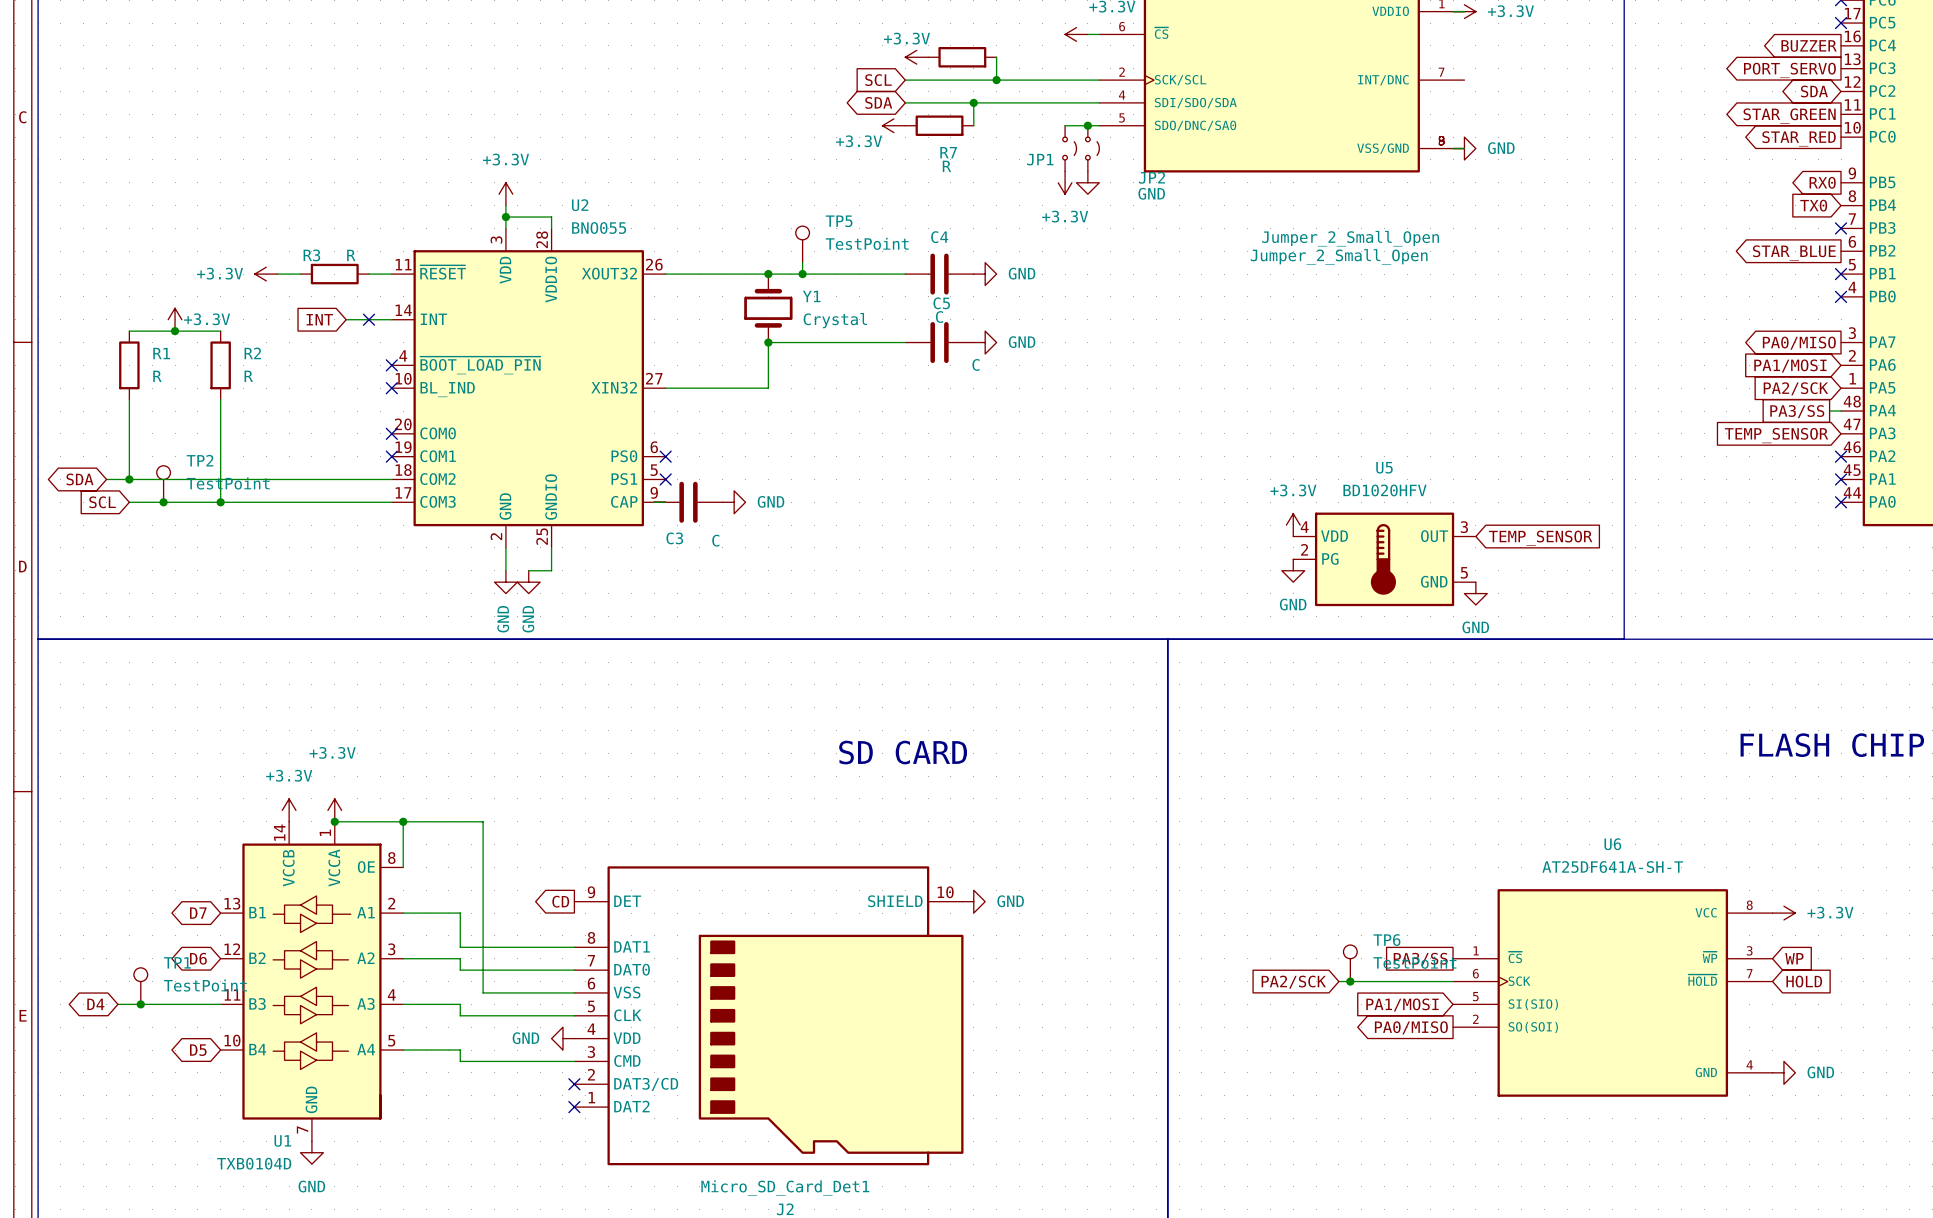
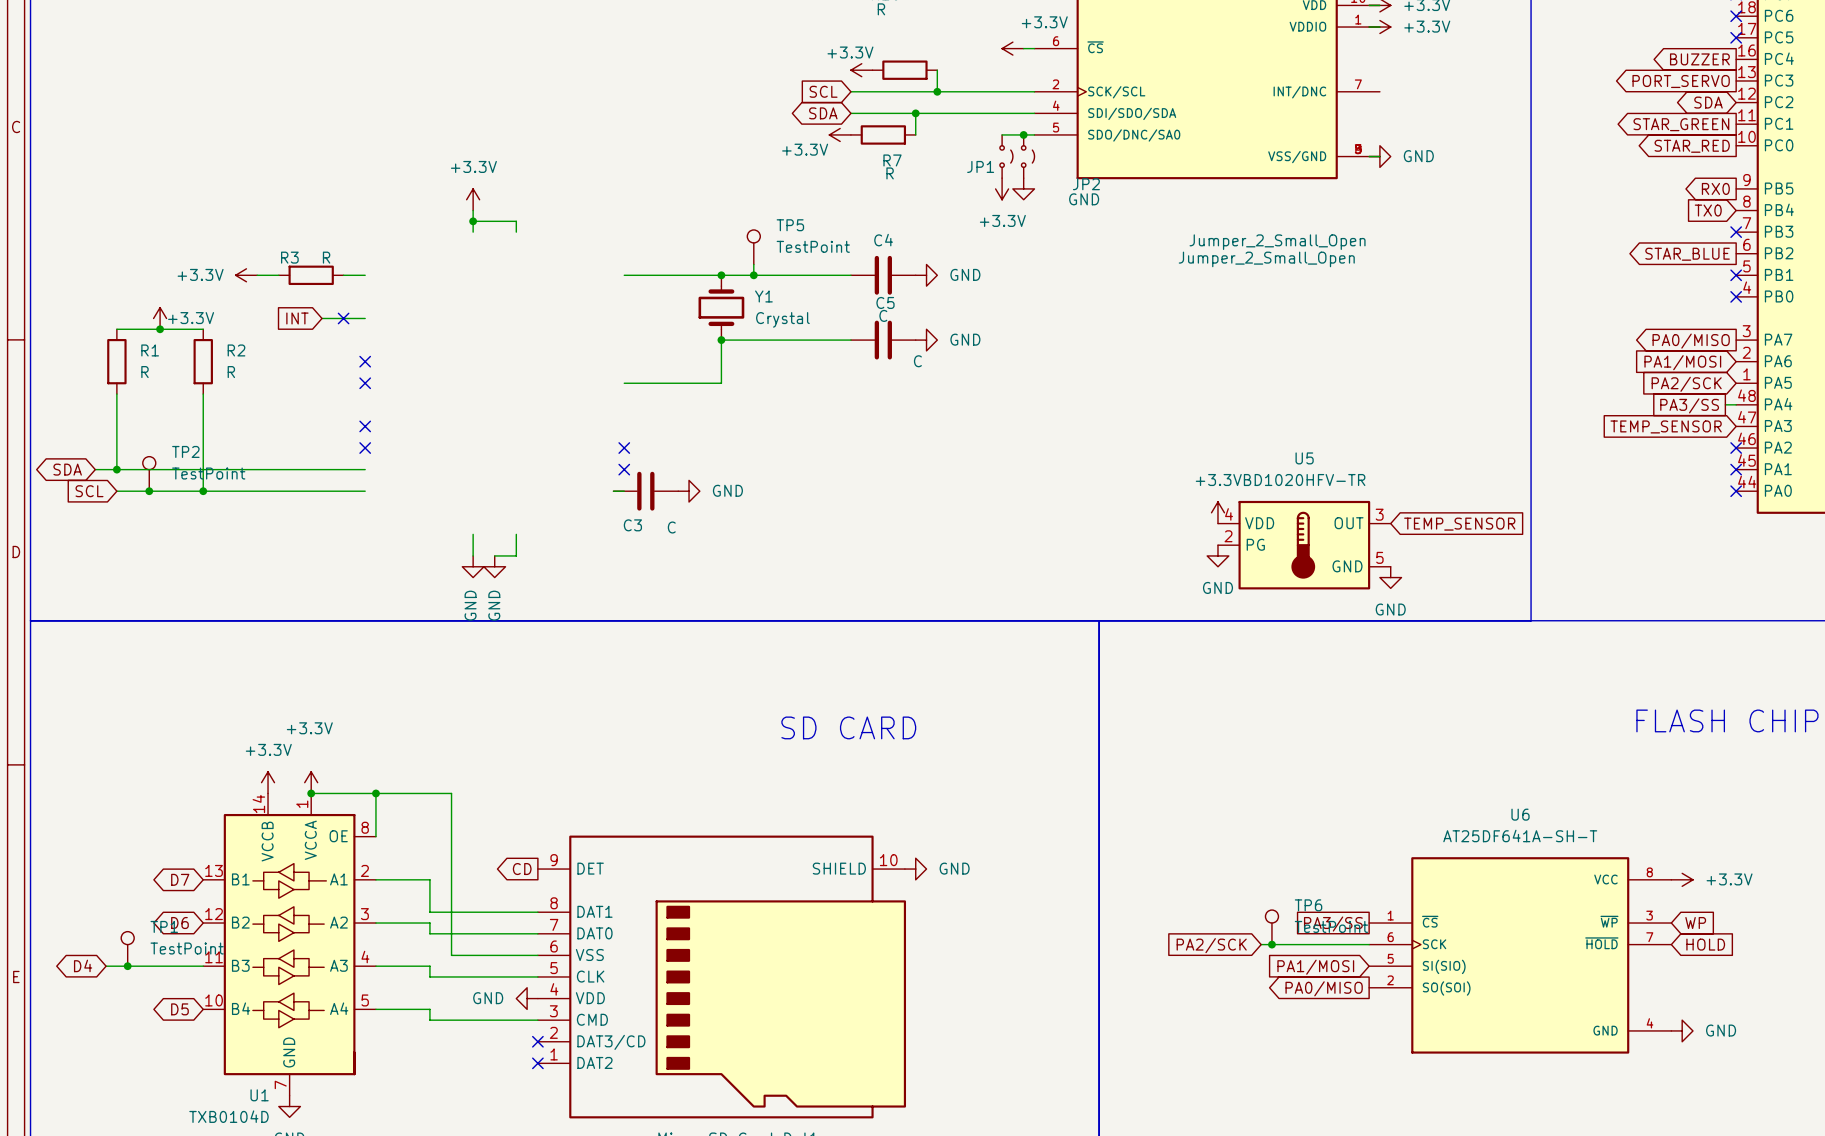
U2: BNO055 (528, 388) -> none
U5 value: BD1020HFV (1384, 490) -> BD1020HFV-TR (1304, 480)

